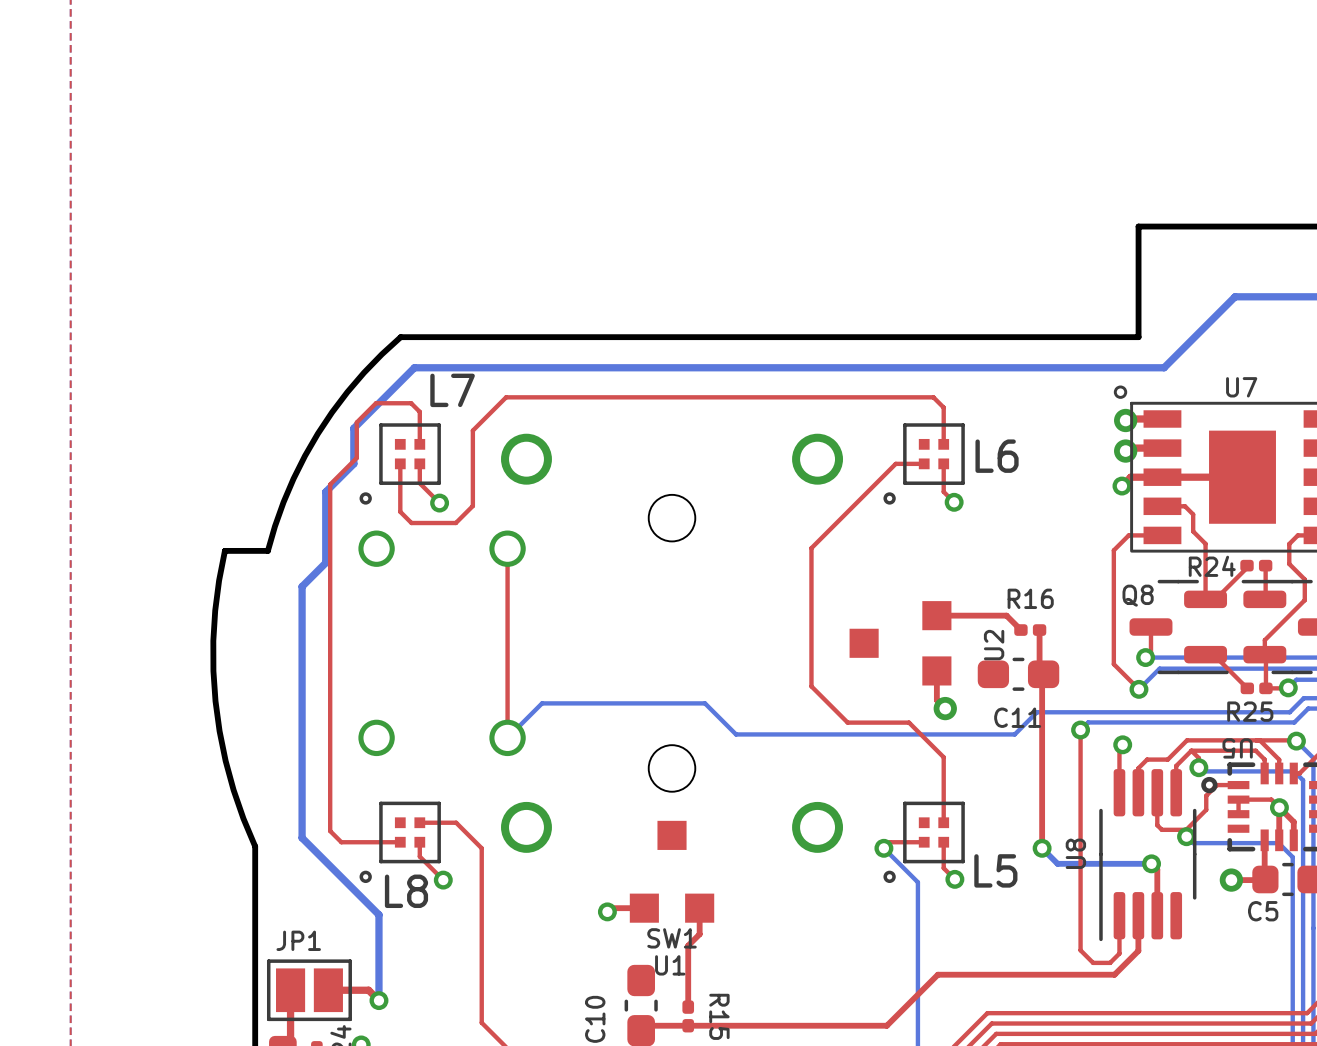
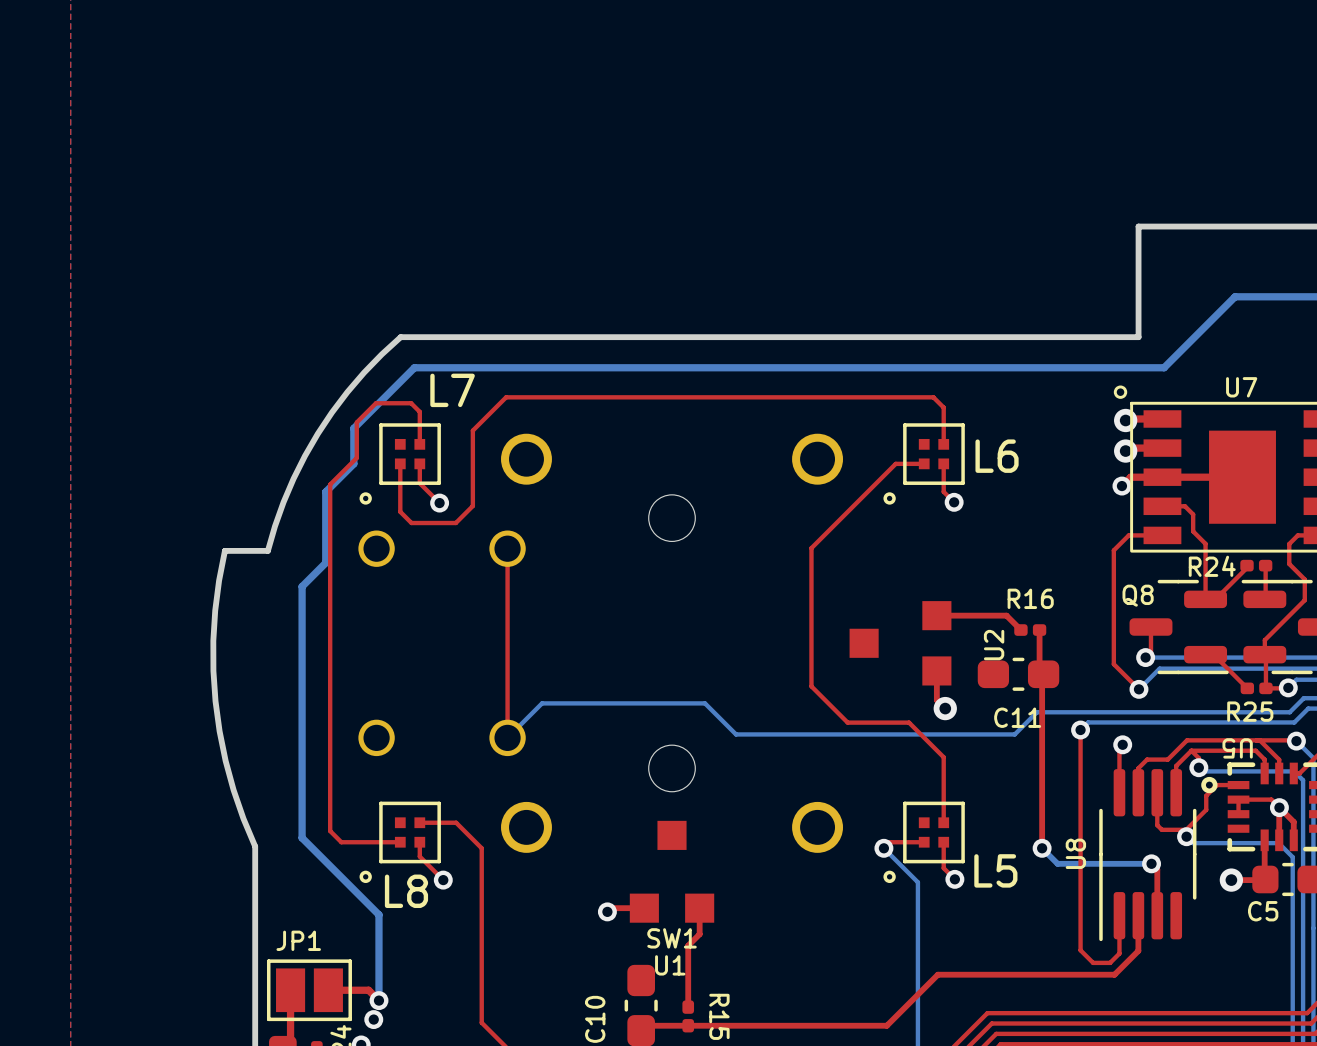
via: none -> (373, 1019)

